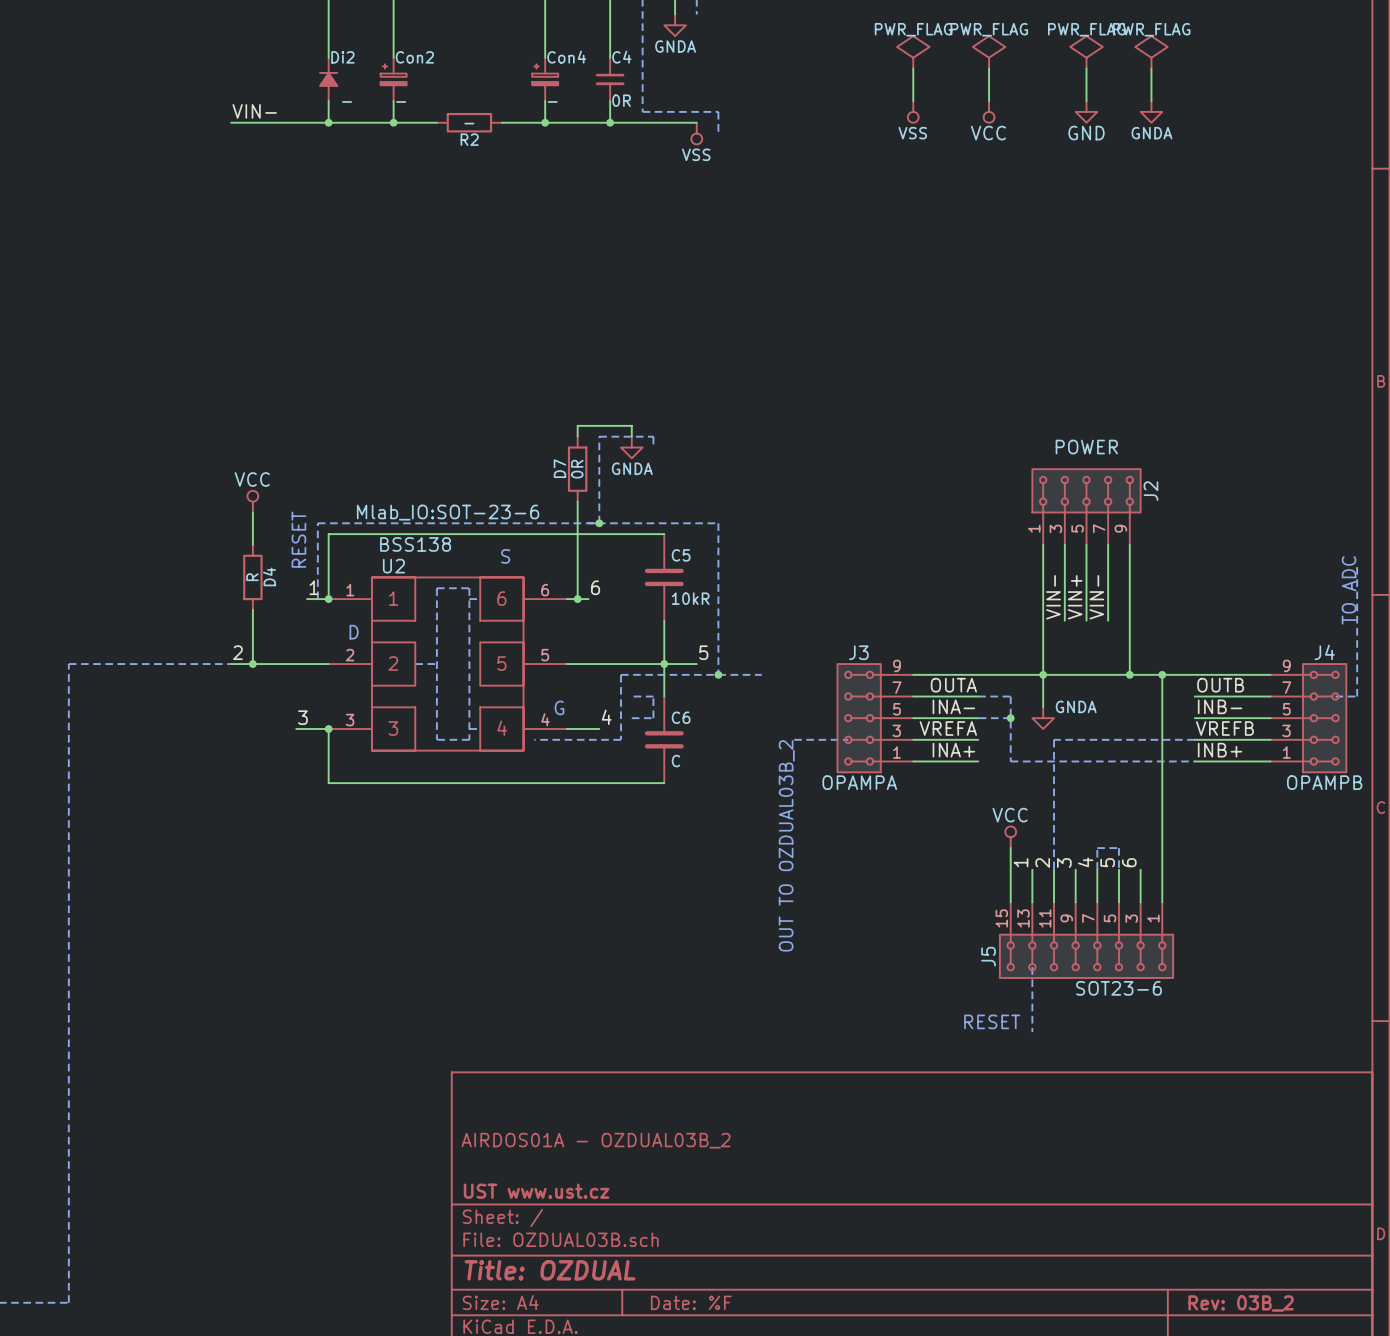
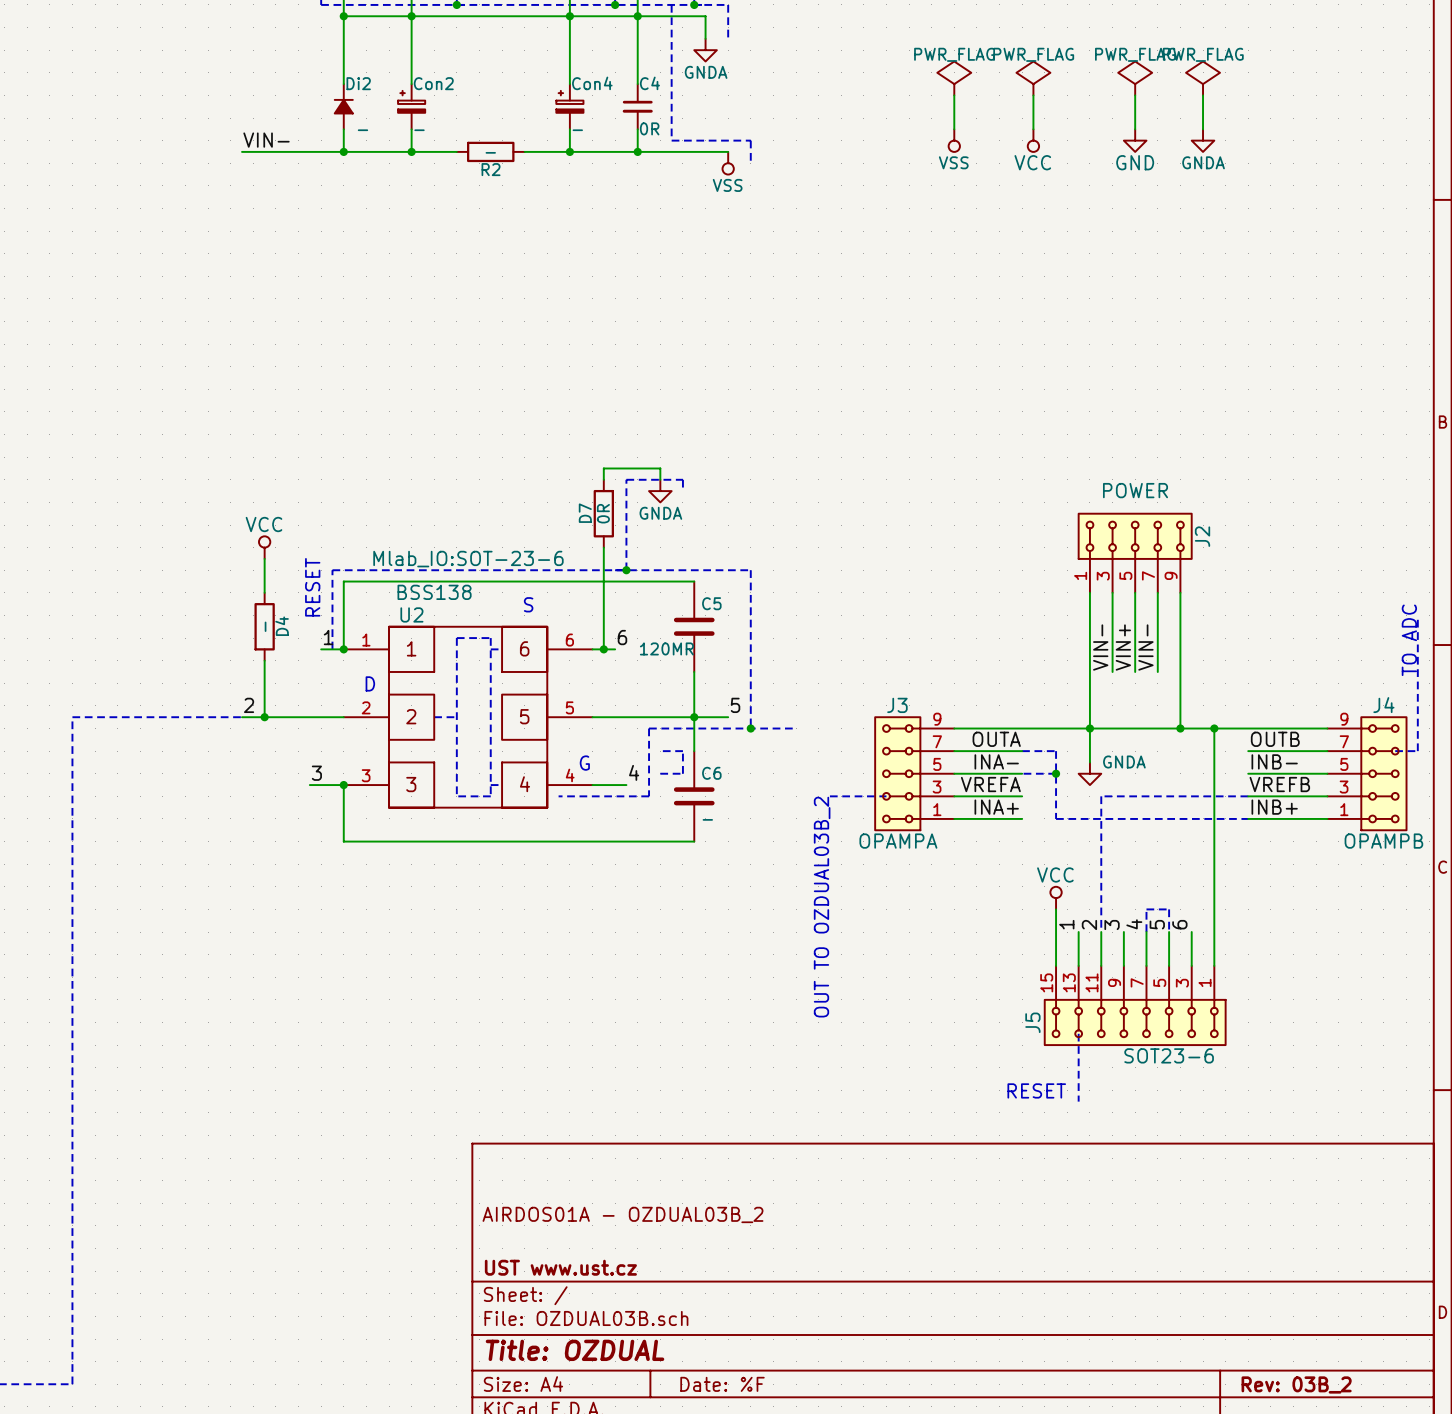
D4 value: R (252, 577) -> - (265, 626)
C5 value: 10kR (690, 598) -> 120MR (666, 648)
C6 value: C (675, 761) -> - (707, 819)

